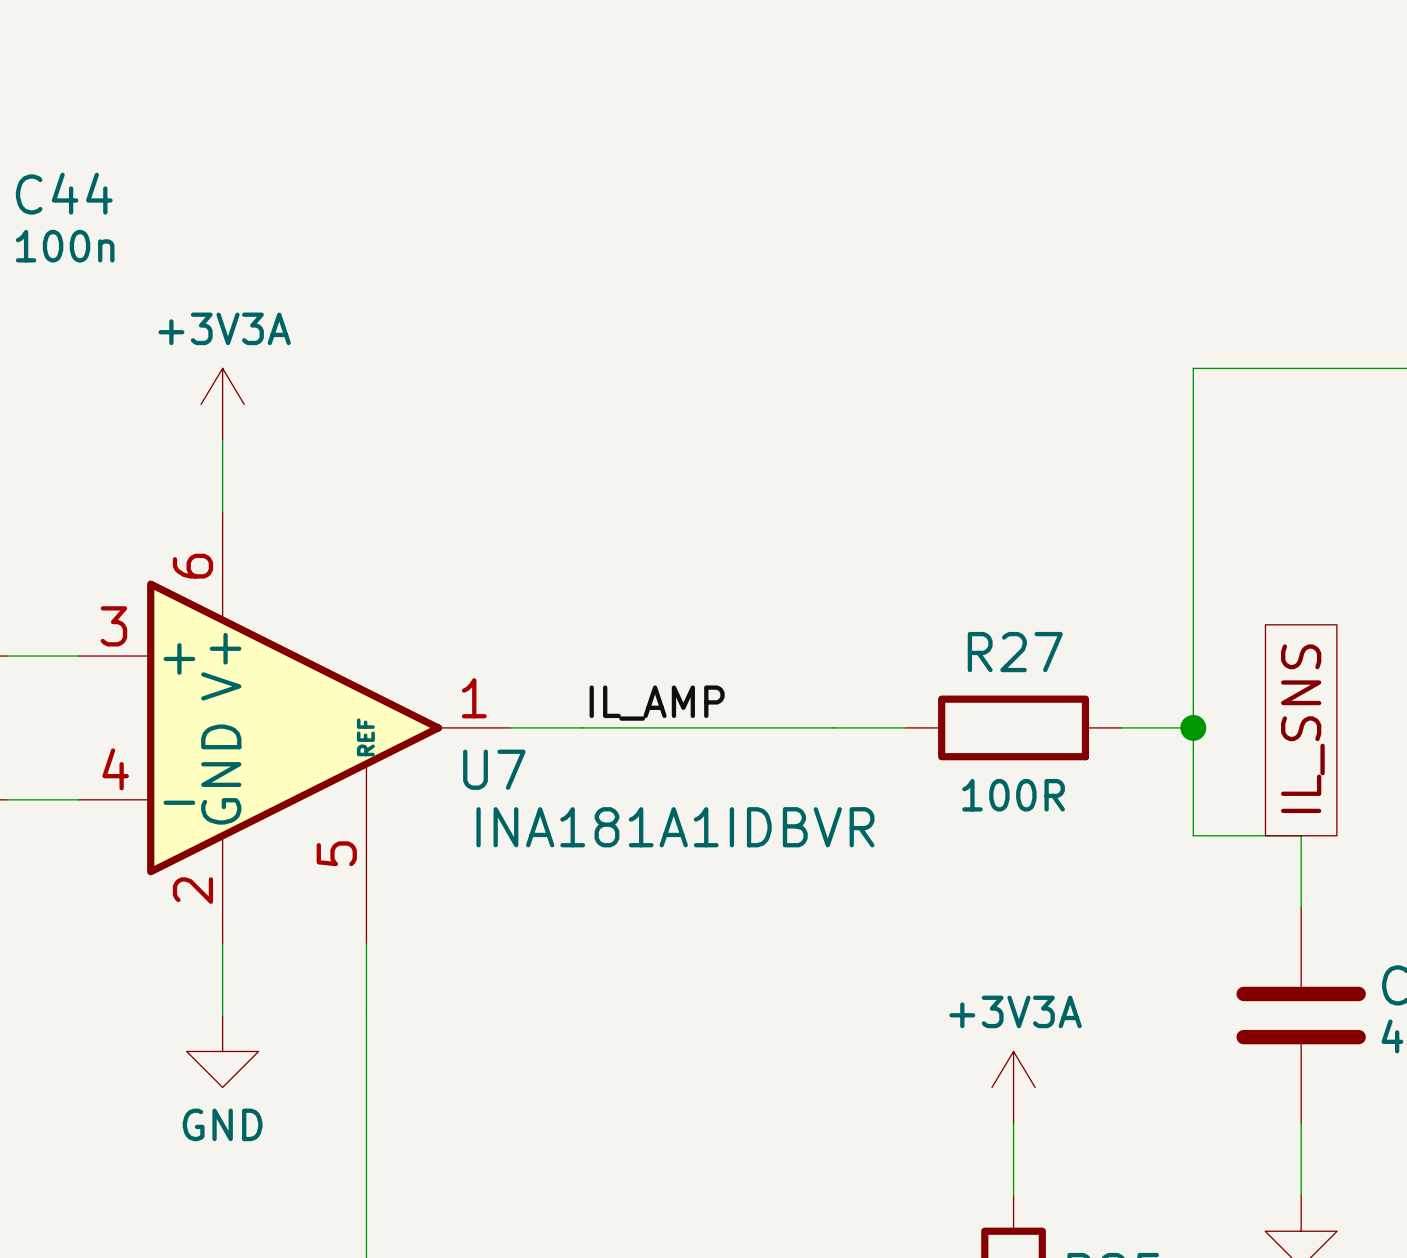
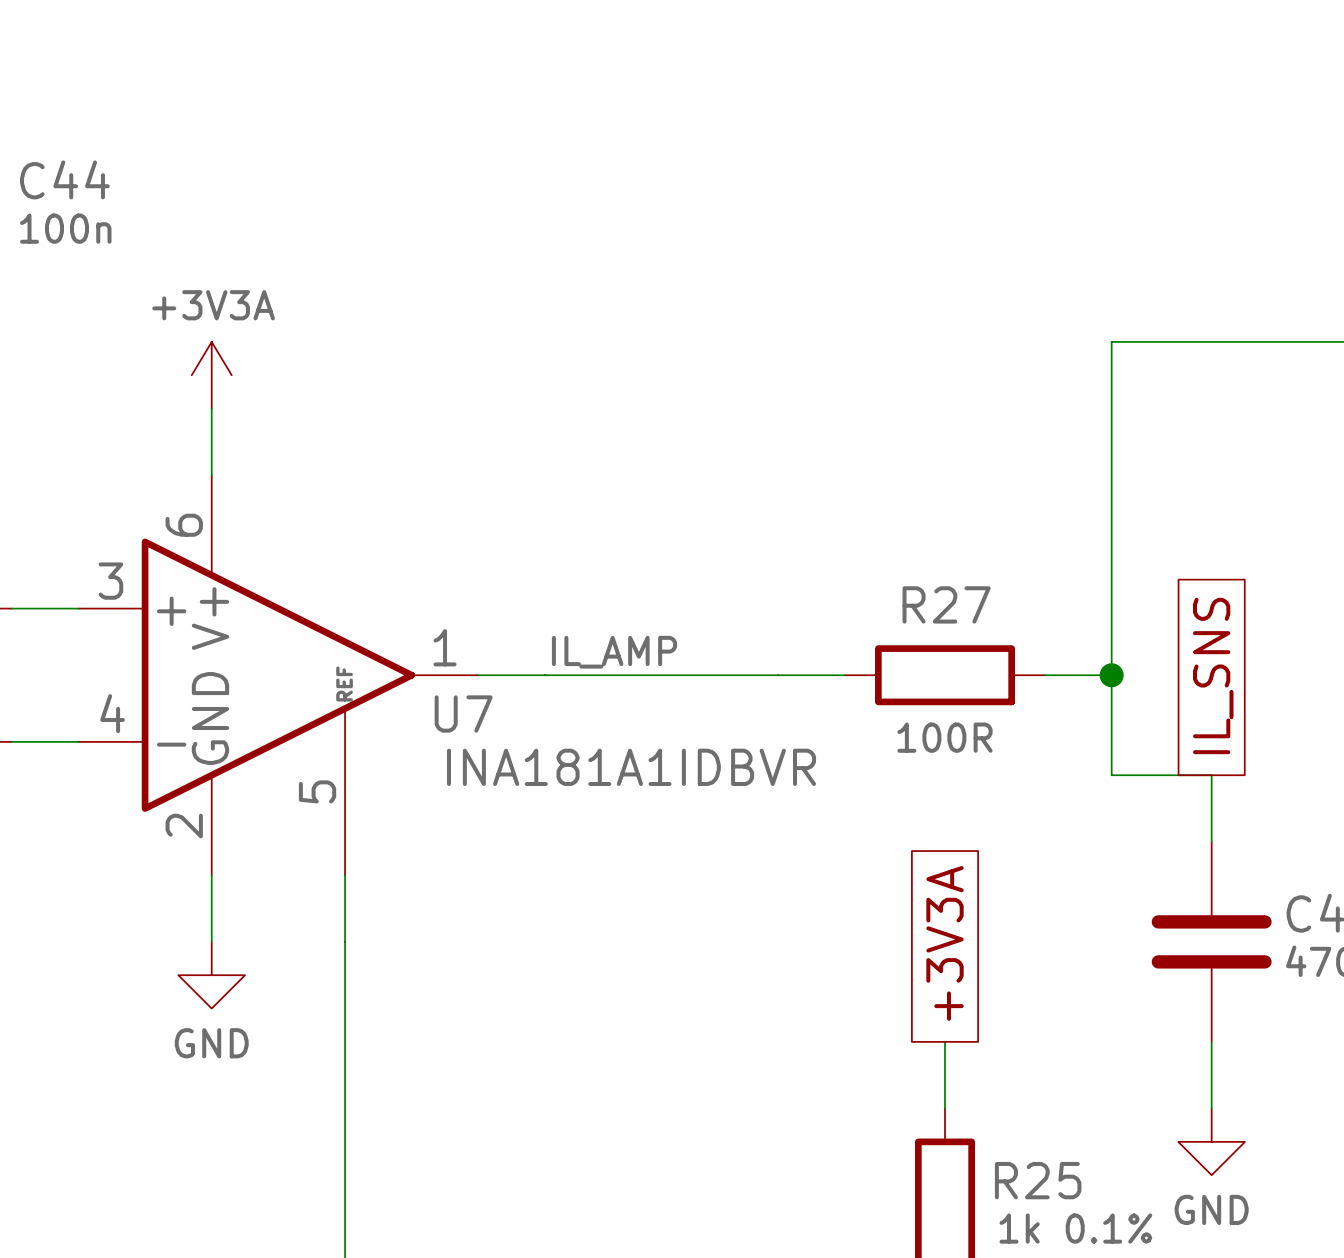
global label: none -> +3V3A (945, 943)
power symbol: +3V3A (1013, 1087) -> none

